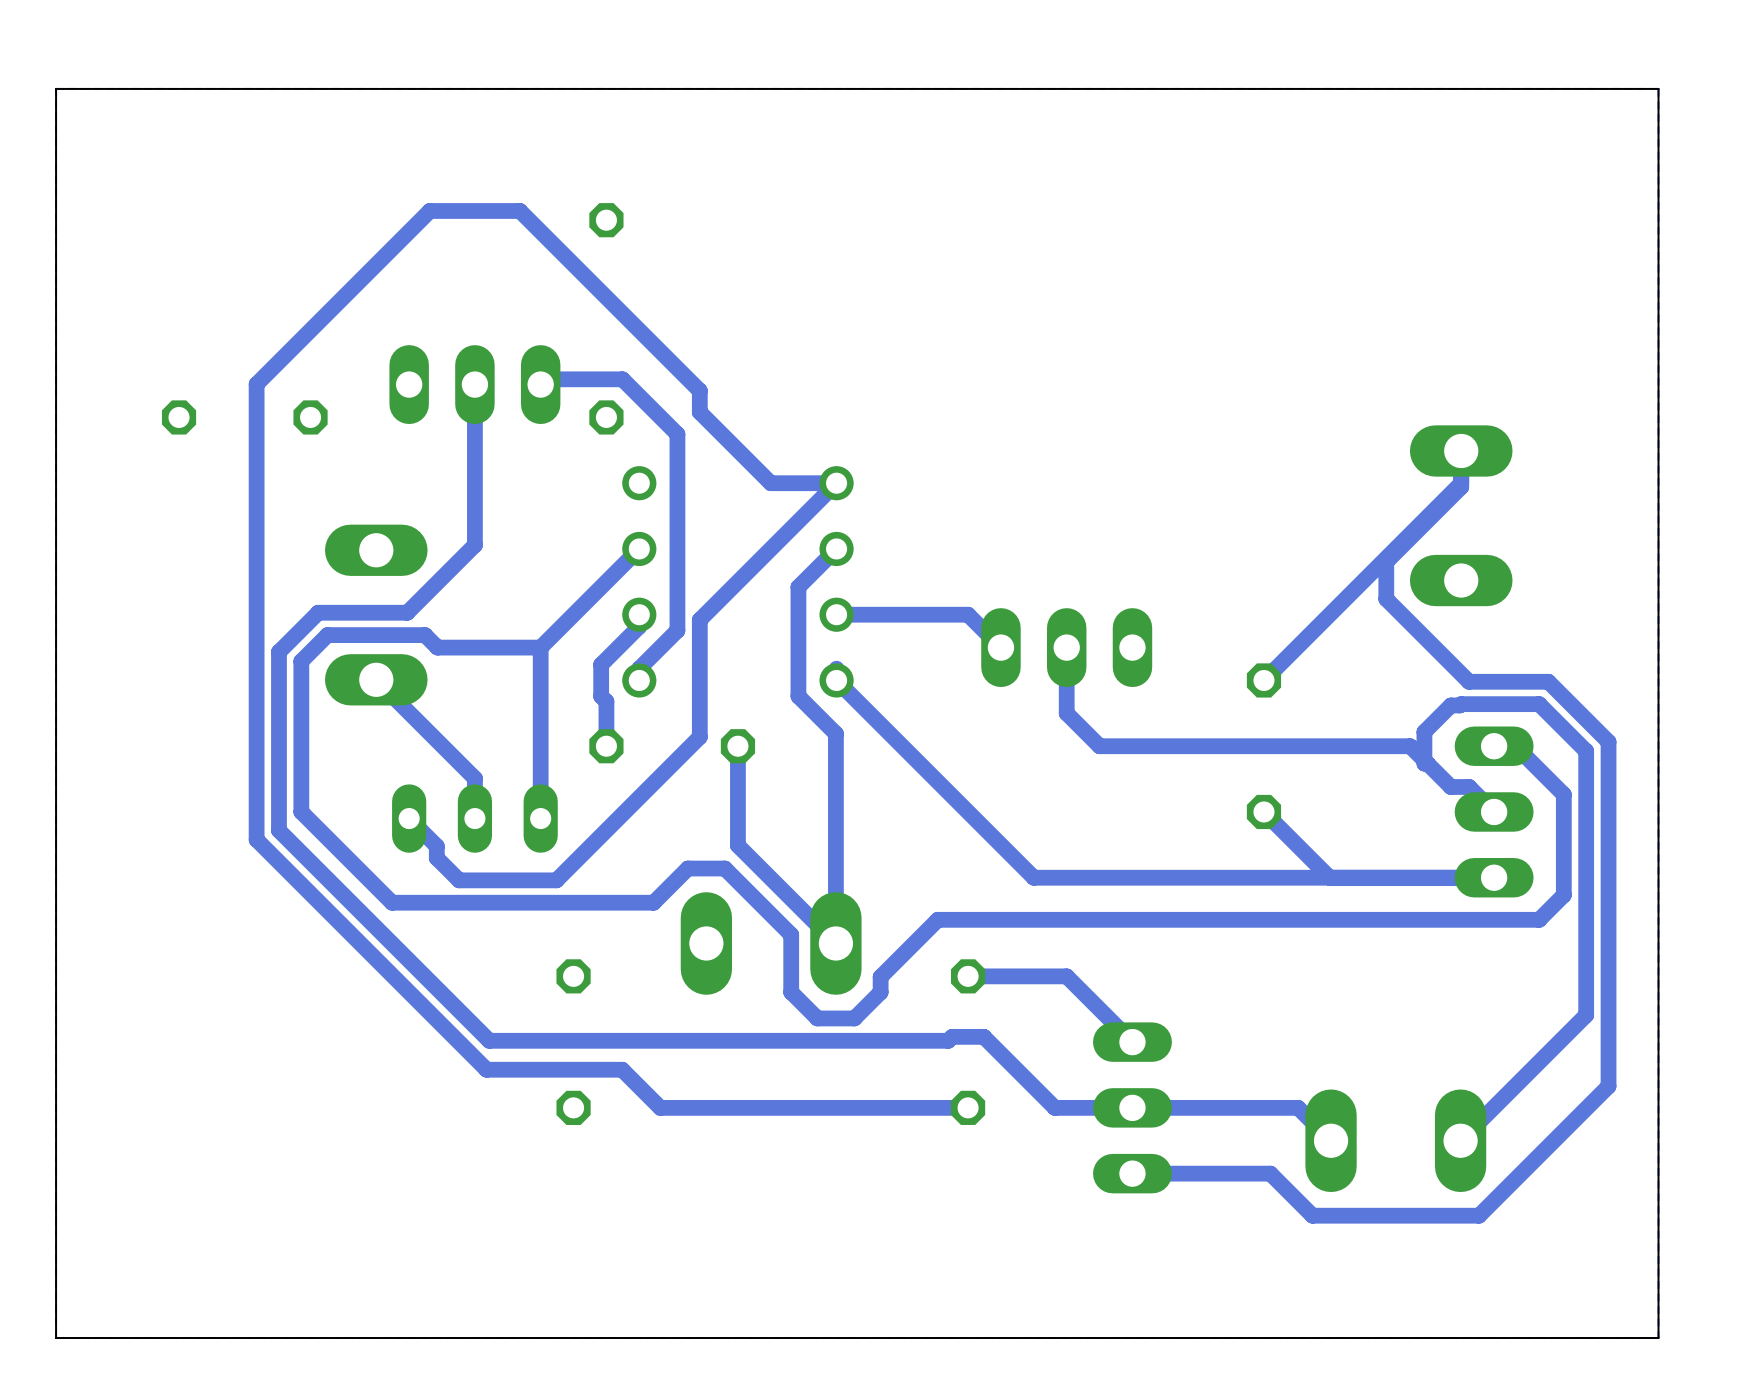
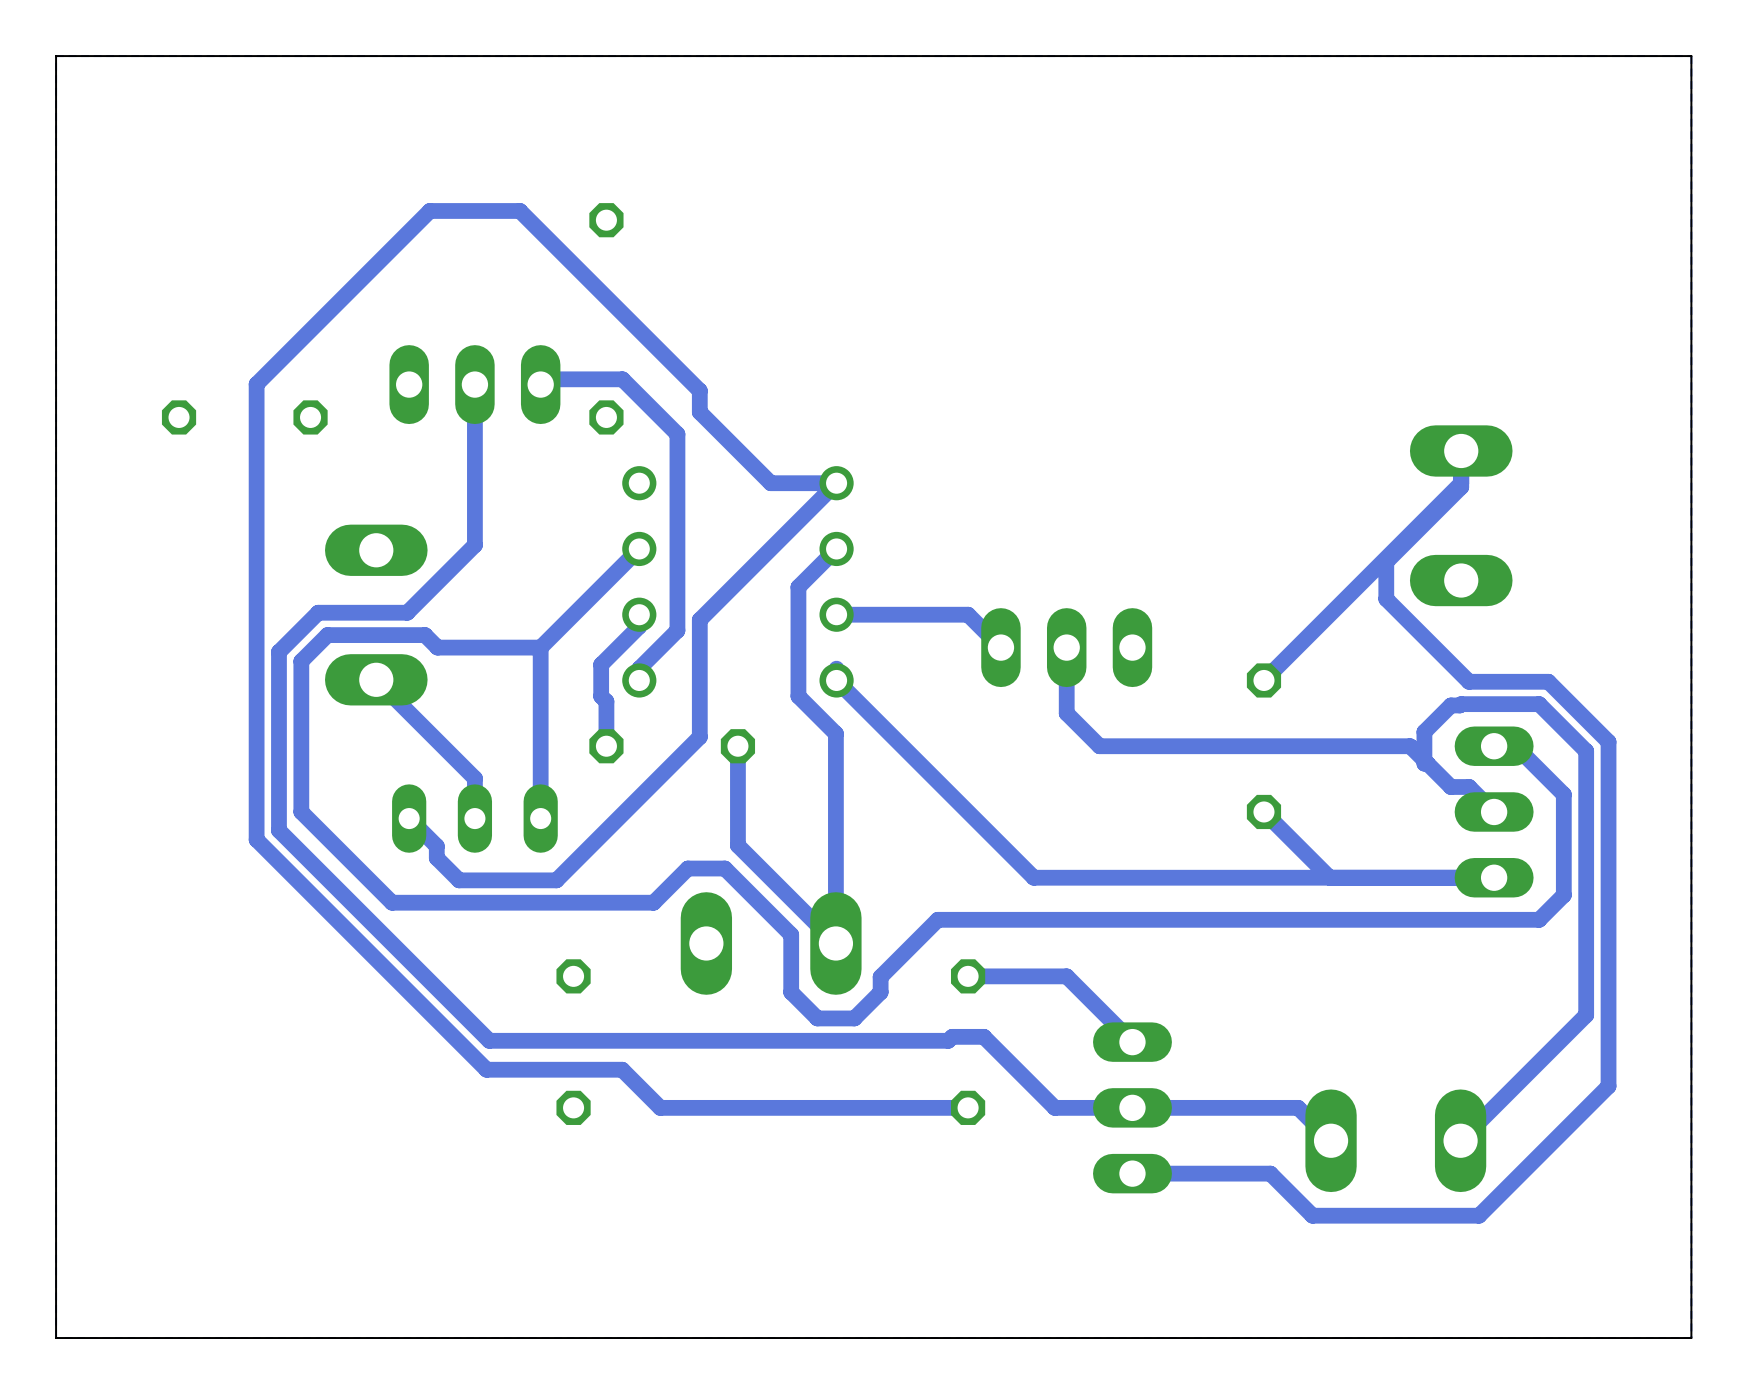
board edge: (56, 88) (1658, 88) (1658, 1338) -> (56, 88) (56, 56) (1691, 56) (1691, 1338) (1658, 1338)

